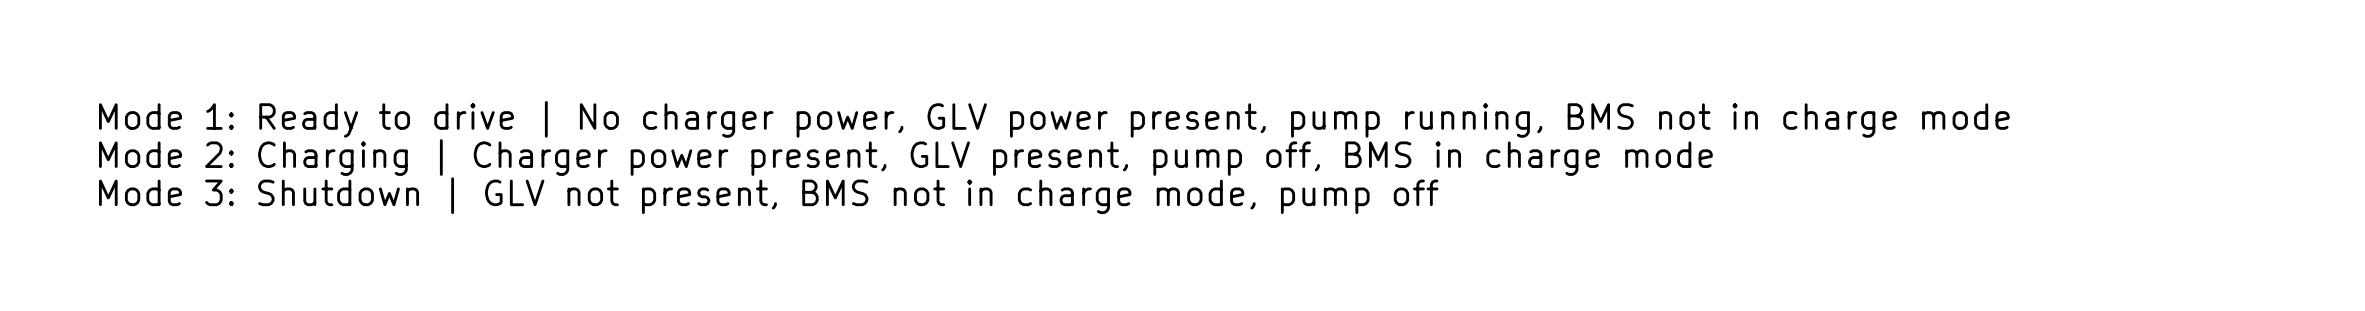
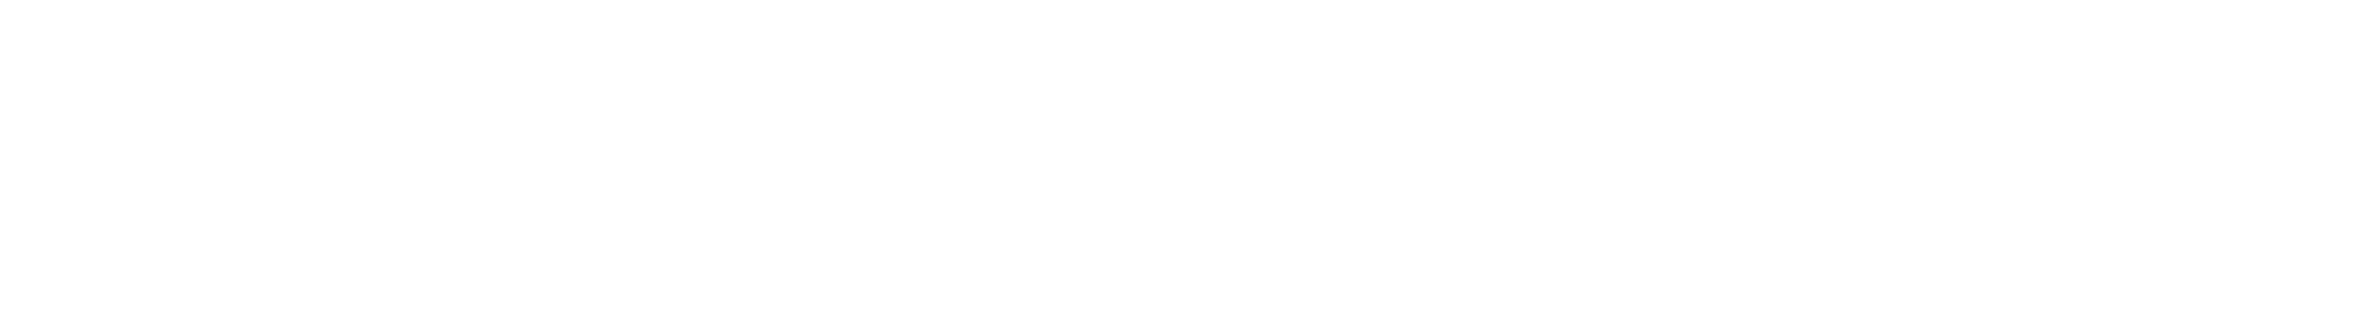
text: Mode 1: Ready to drive | No charger power, GLV power present, pump running, BMS not in charge mode (1054, 119) -> none
text: Mode 2: Charging | Charger power present, GLV present, pump off, BMS in charge mode (905, 157) -> none
text: Mode 3: Shutdown | GLV not present, BMS not in charge mode, pump off (768, 195) -> none

